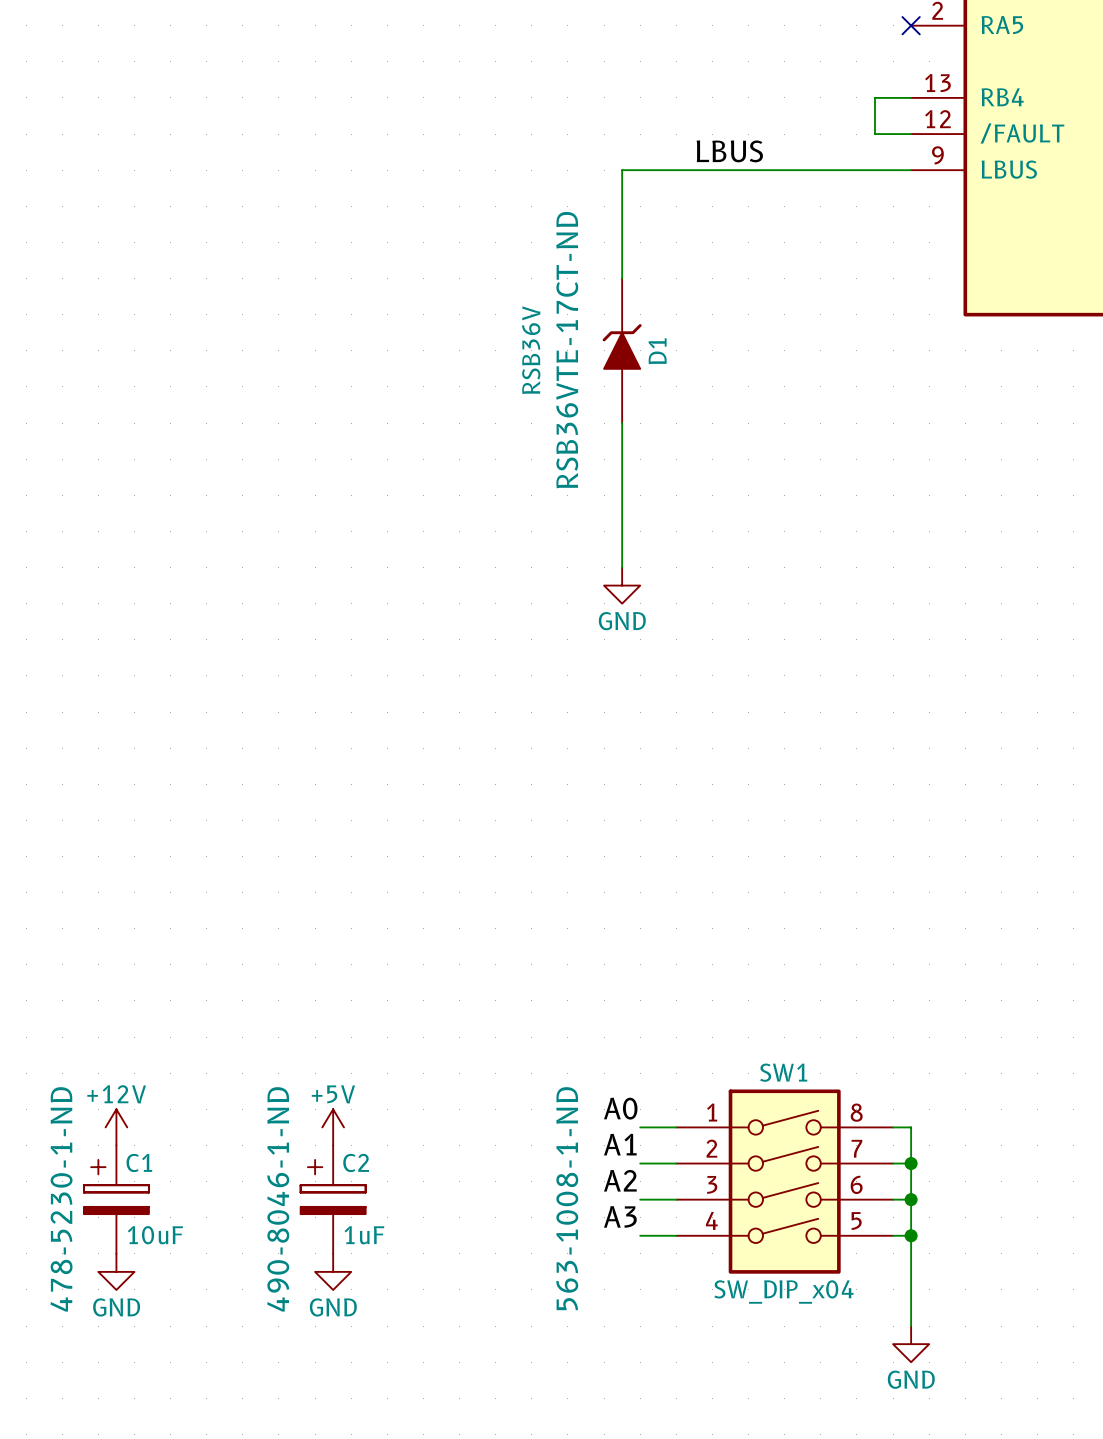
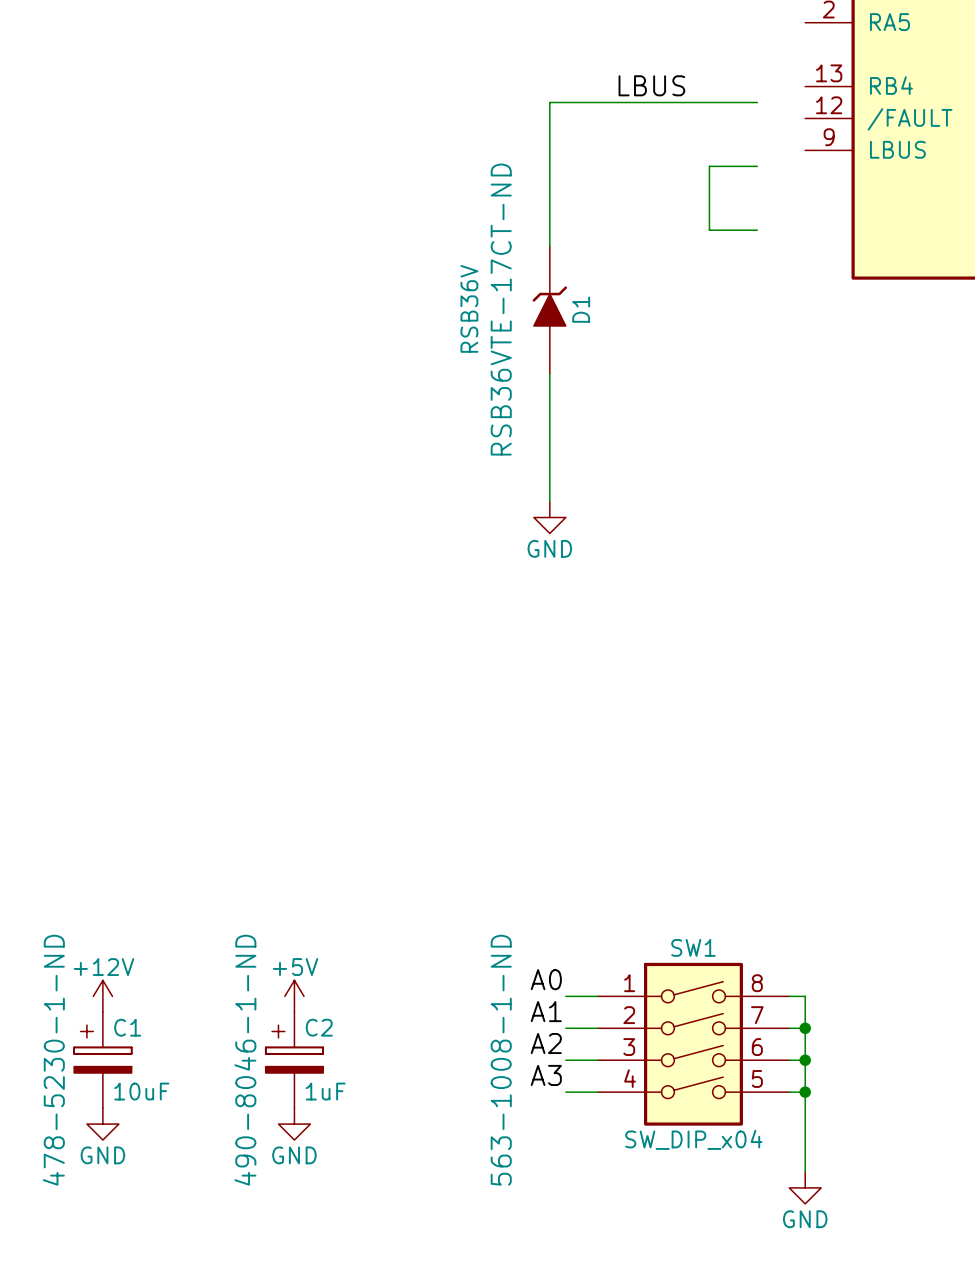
no-connect mark: (911, 25) -> none
wire: (911, 97) (874, 97) (874, 134) (911, 134) -> none
label position: LBUS (729, 151) -> LBUS (651, 85)
wire: (622, 170) (911, 170) -> (549, 150) (549, 102) (757, 102)
wire: none -> (757, 166) (709, 166) (709, 230) (757, 230)

